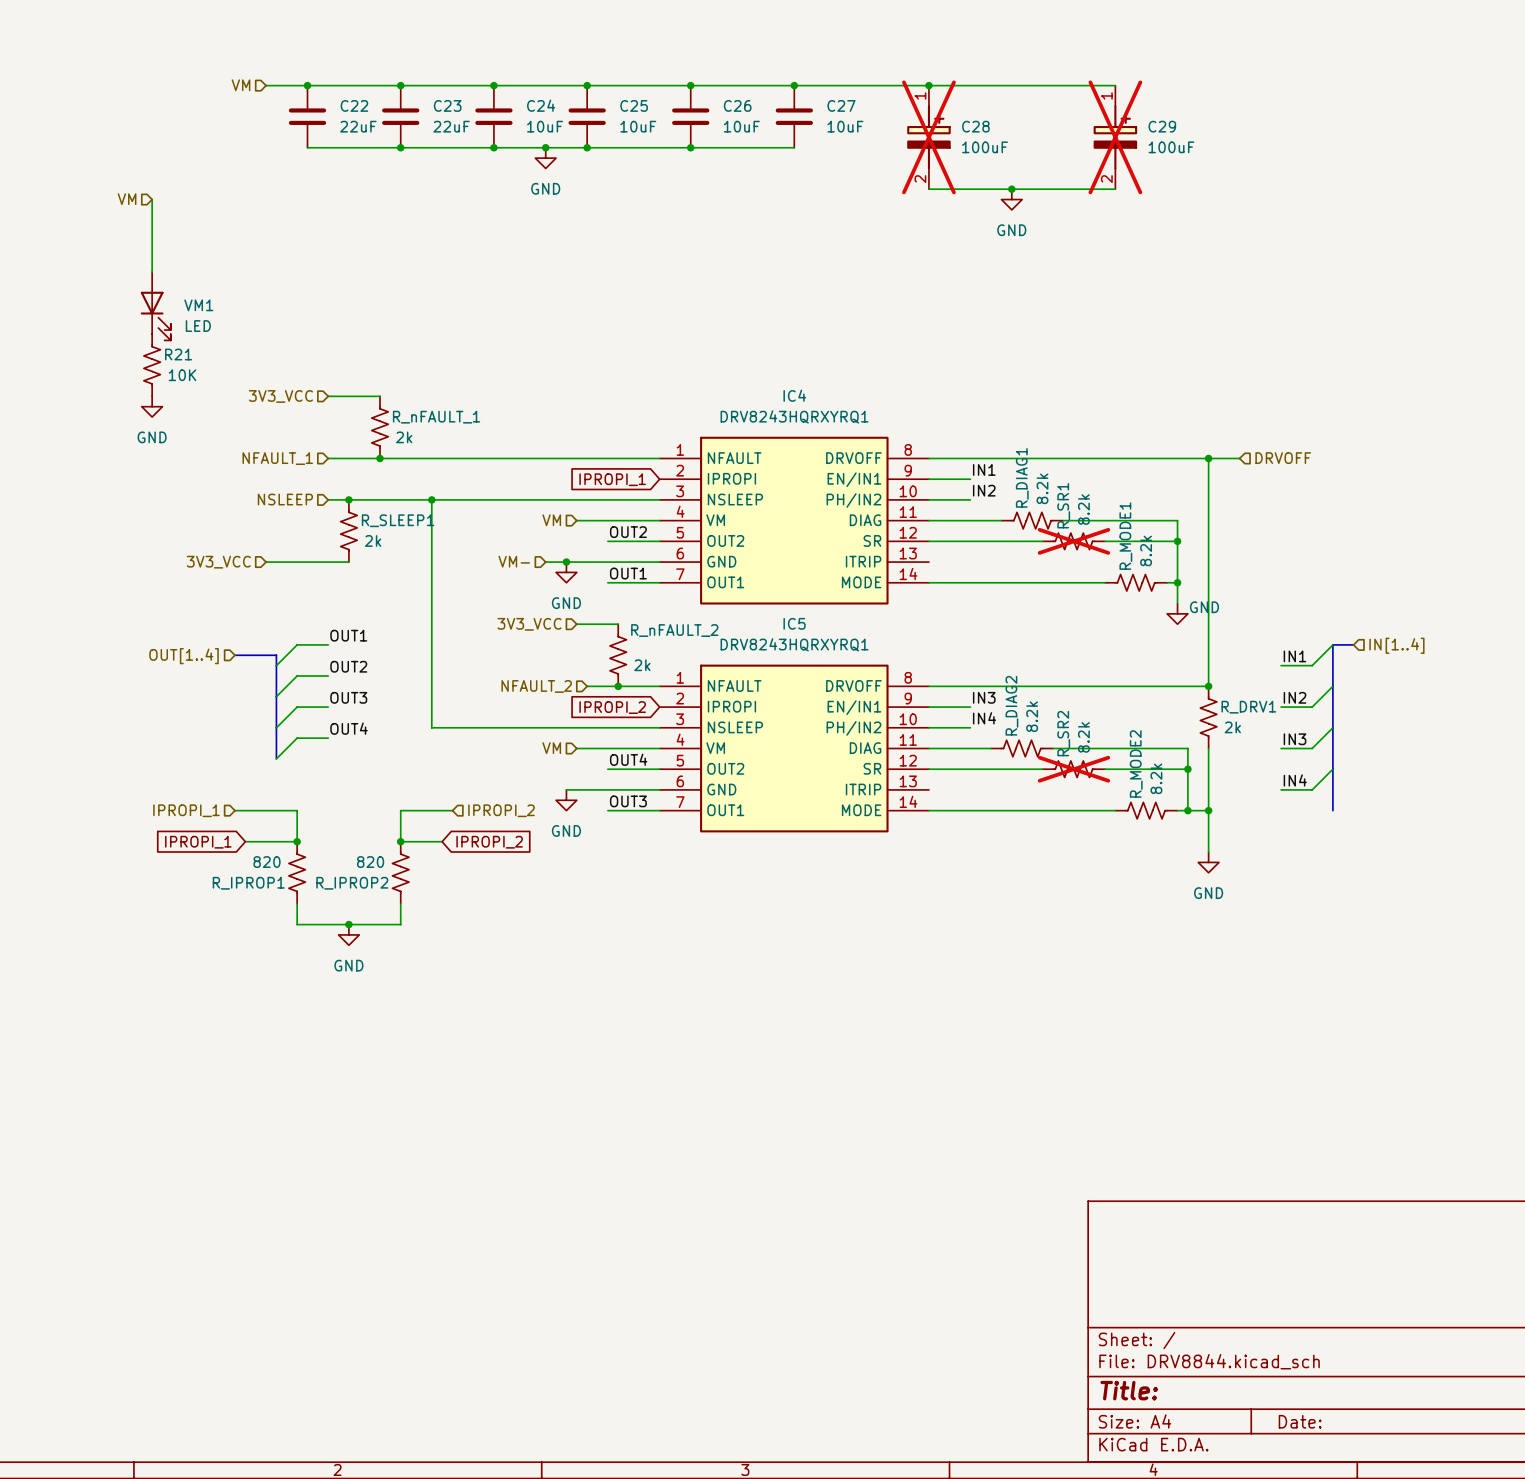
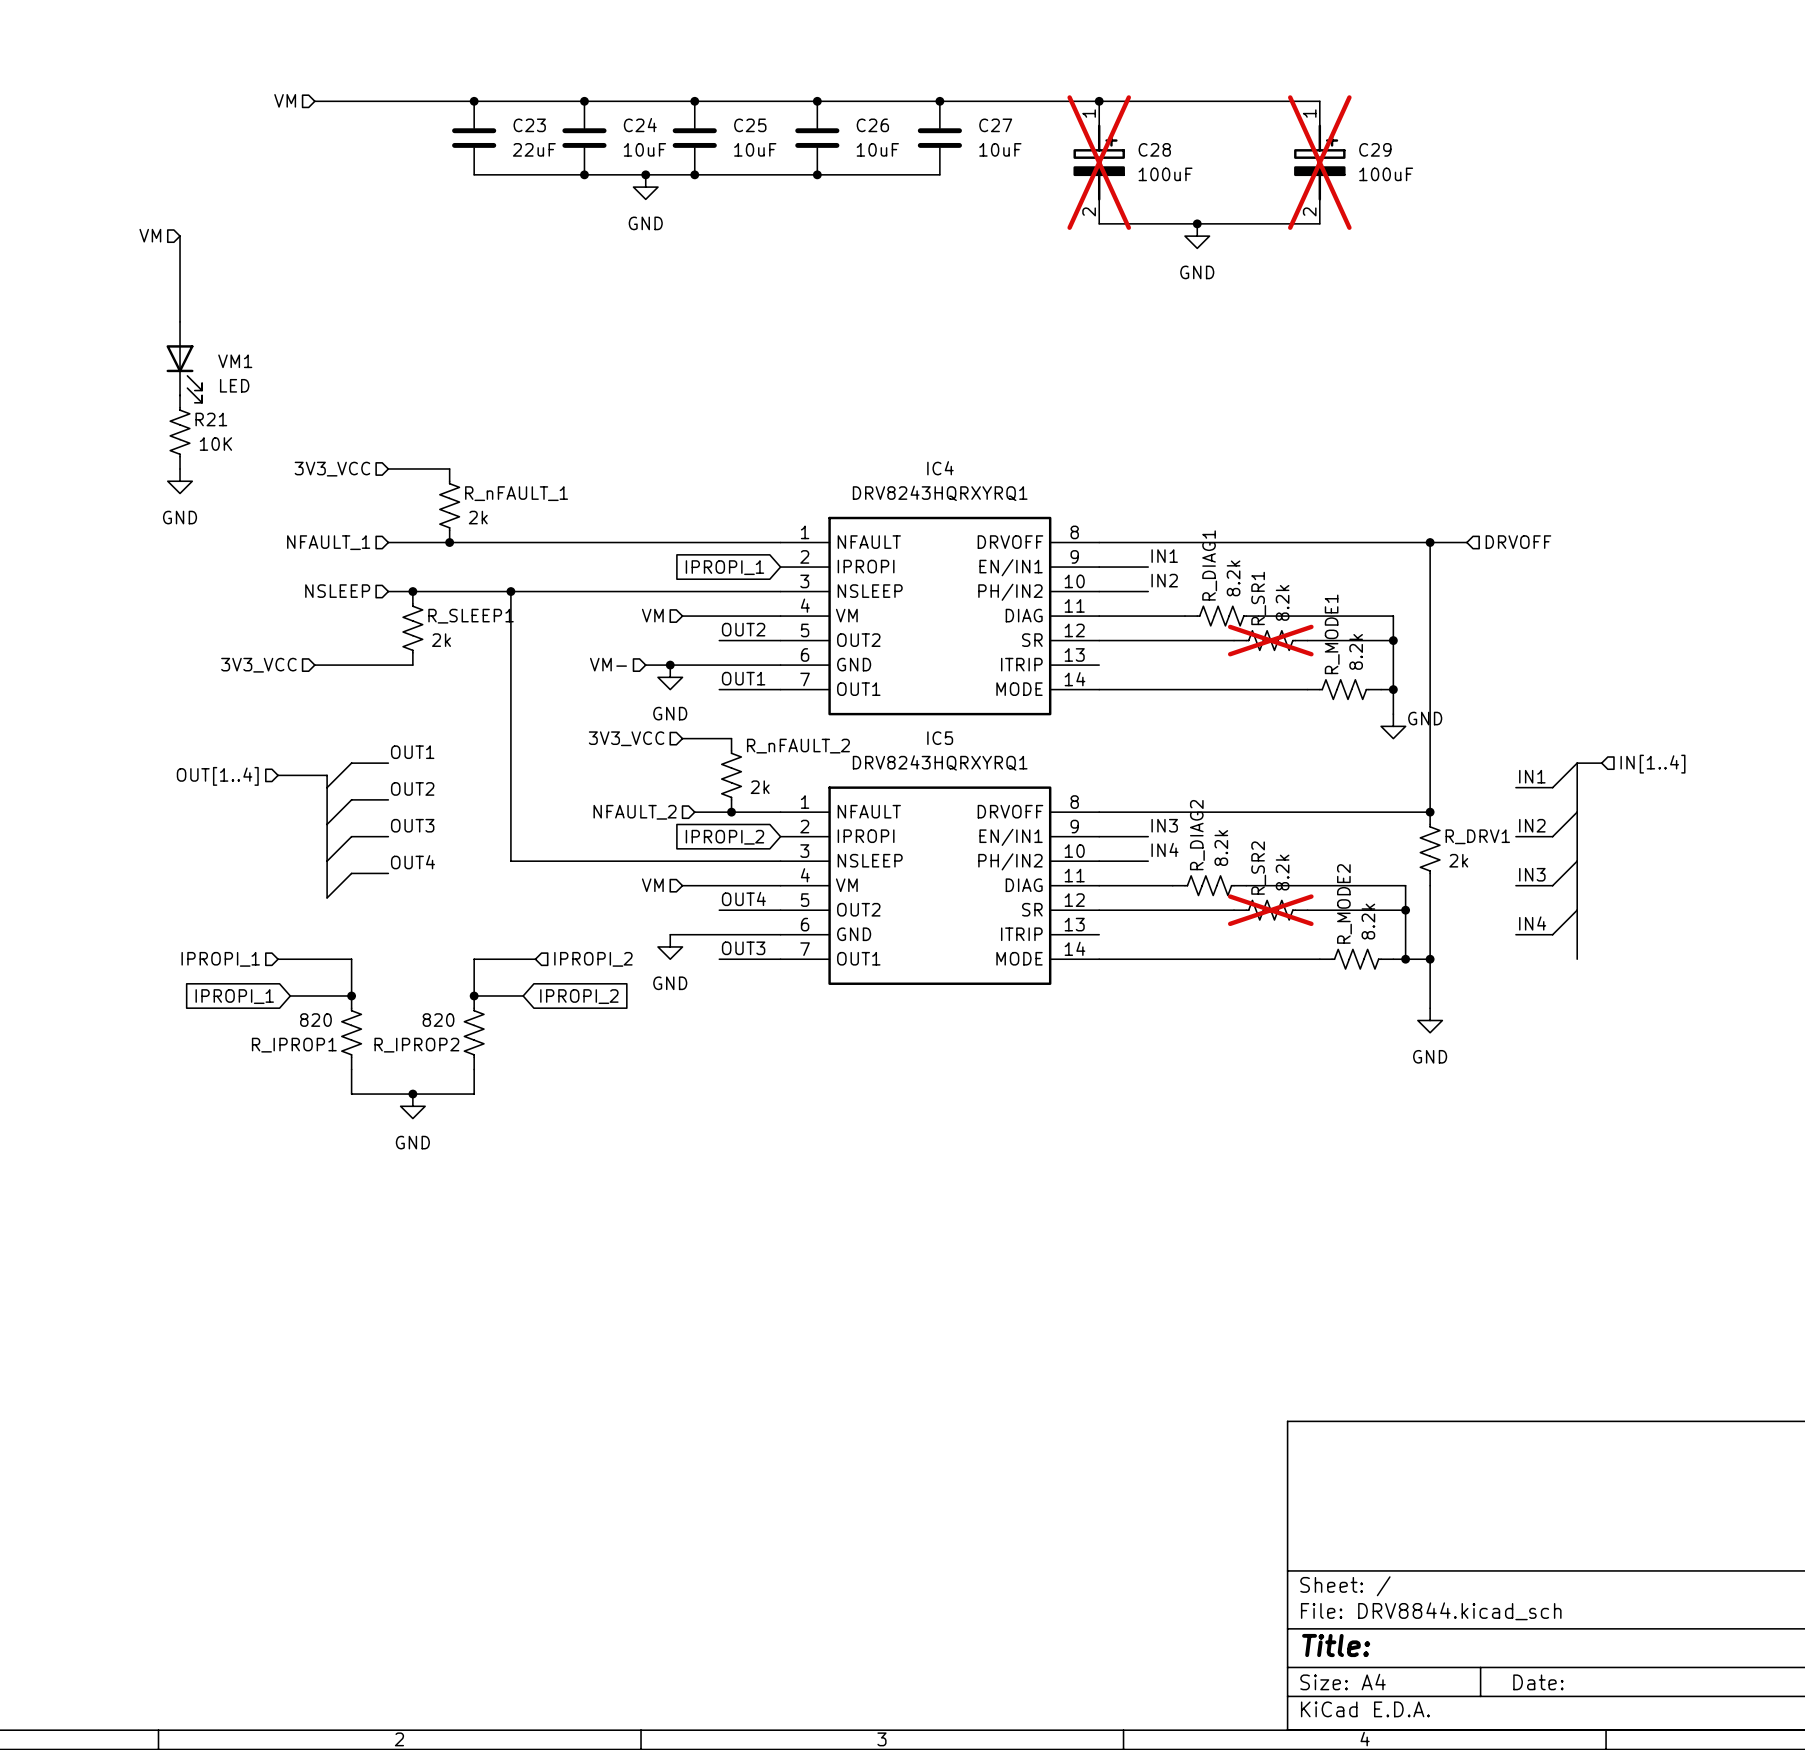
junction: (307, 85) -> none
C22: 22uF (307, 116) -> none
wire: (307, 147) (400, 147) -> none
junction: (400, 147) -> none

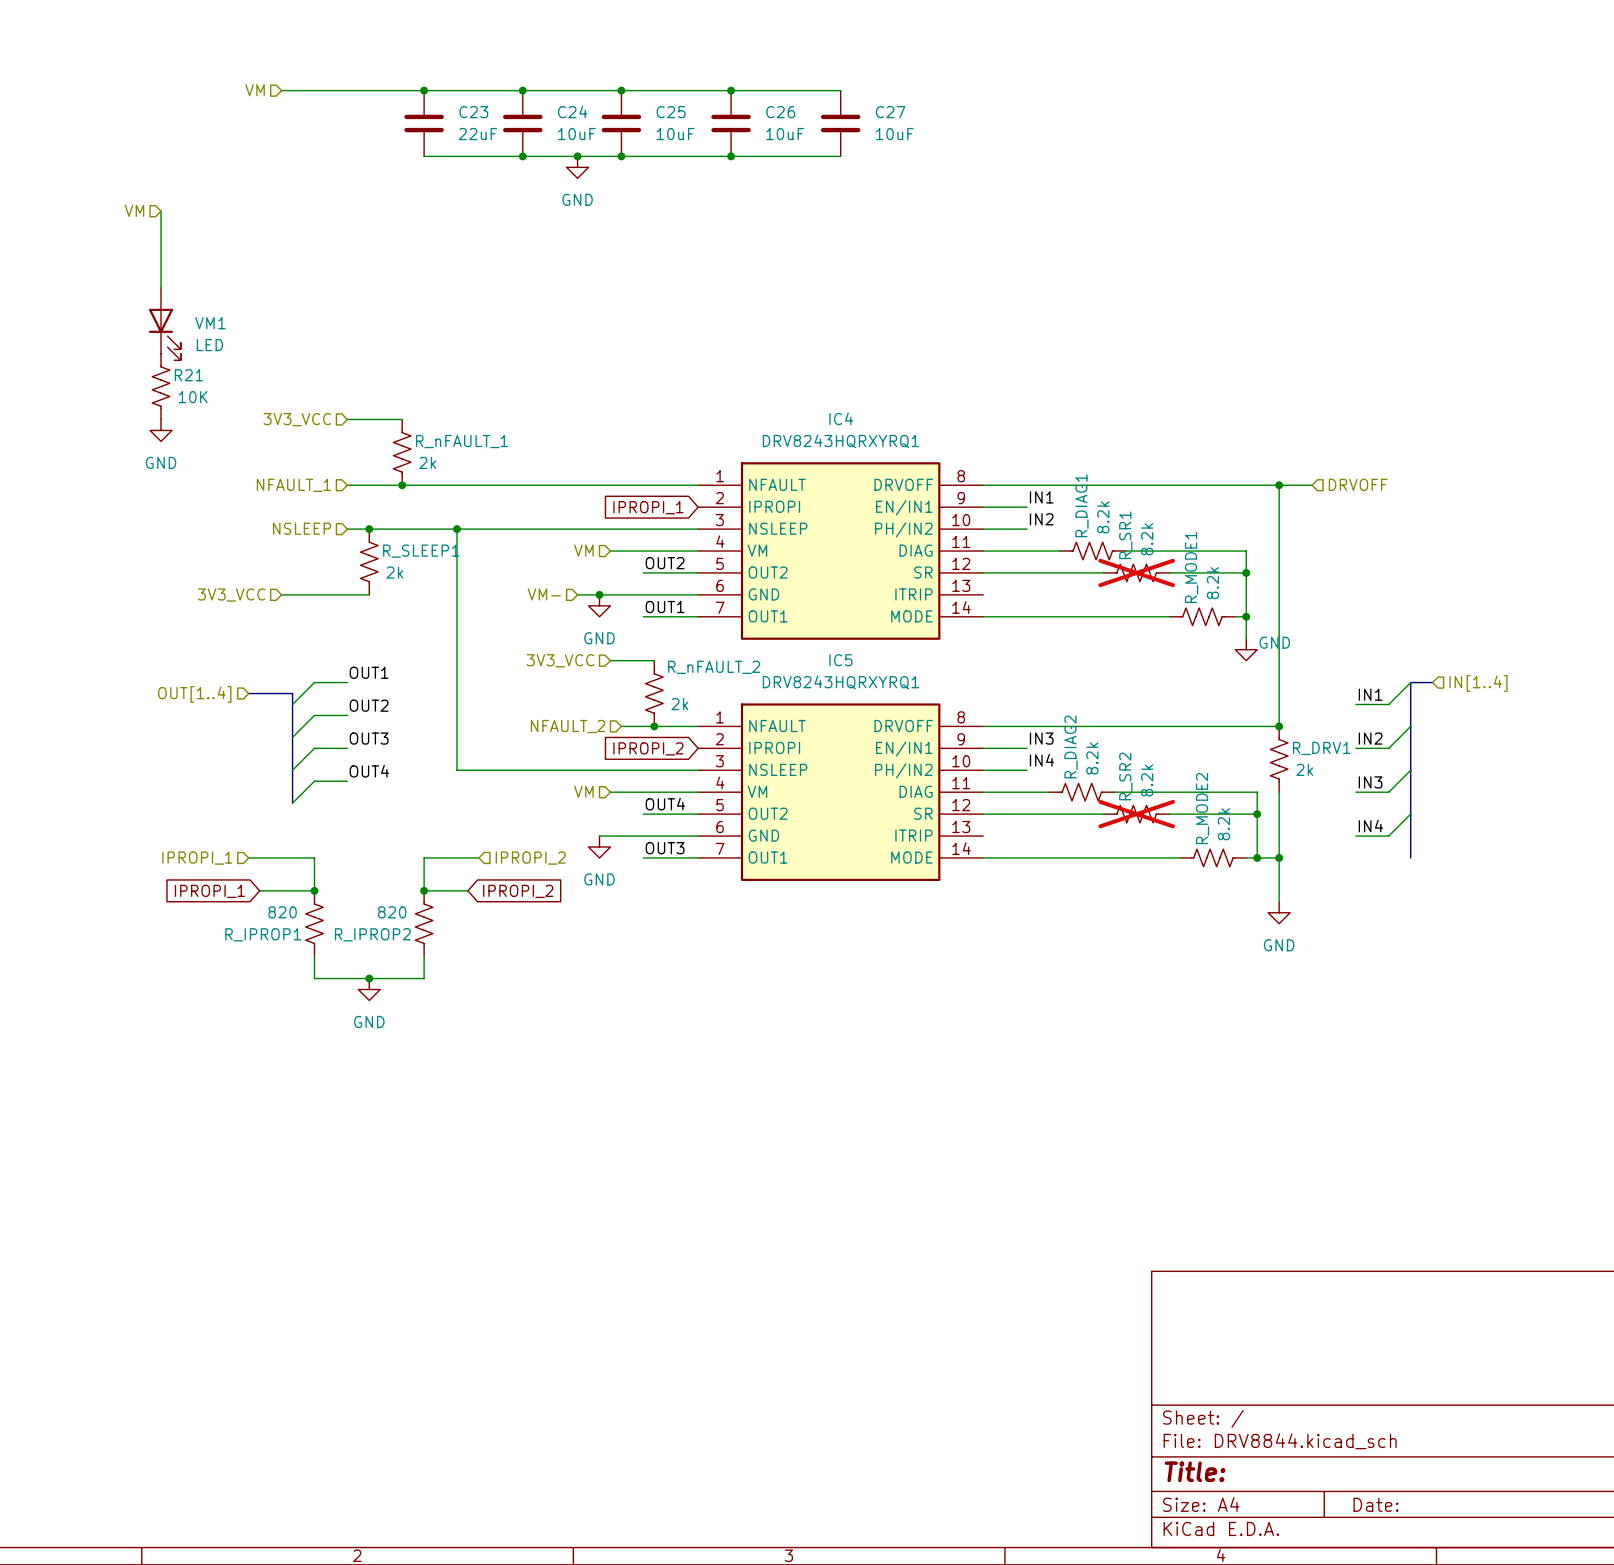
wire: (939, 101) (1319, 101) -> none
junction: (939, 101) -> none
junction: (1099, 101) -> none
C28: 100uF (1099, 162) -> none
C29: 100uF (1319, 162) -> none
wire: (1099, 223) (1319, 223) -> none
junction: (1197, 223) -> none
power symbol: GND (1197, 236) -> none

